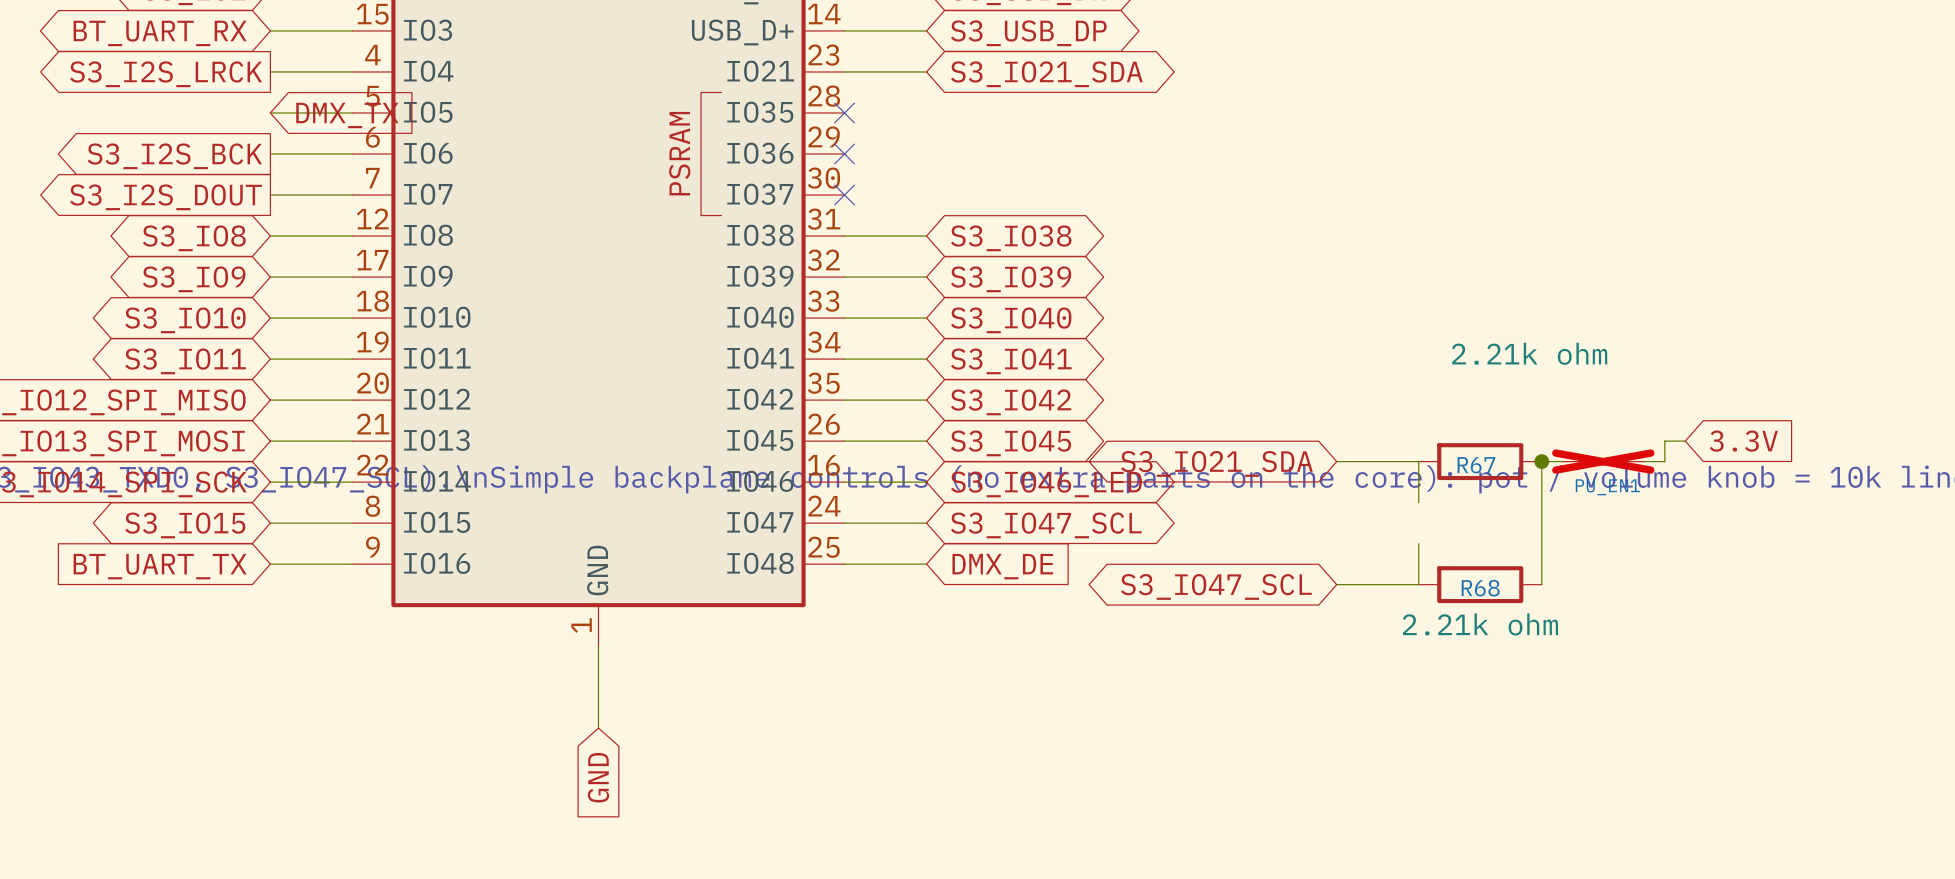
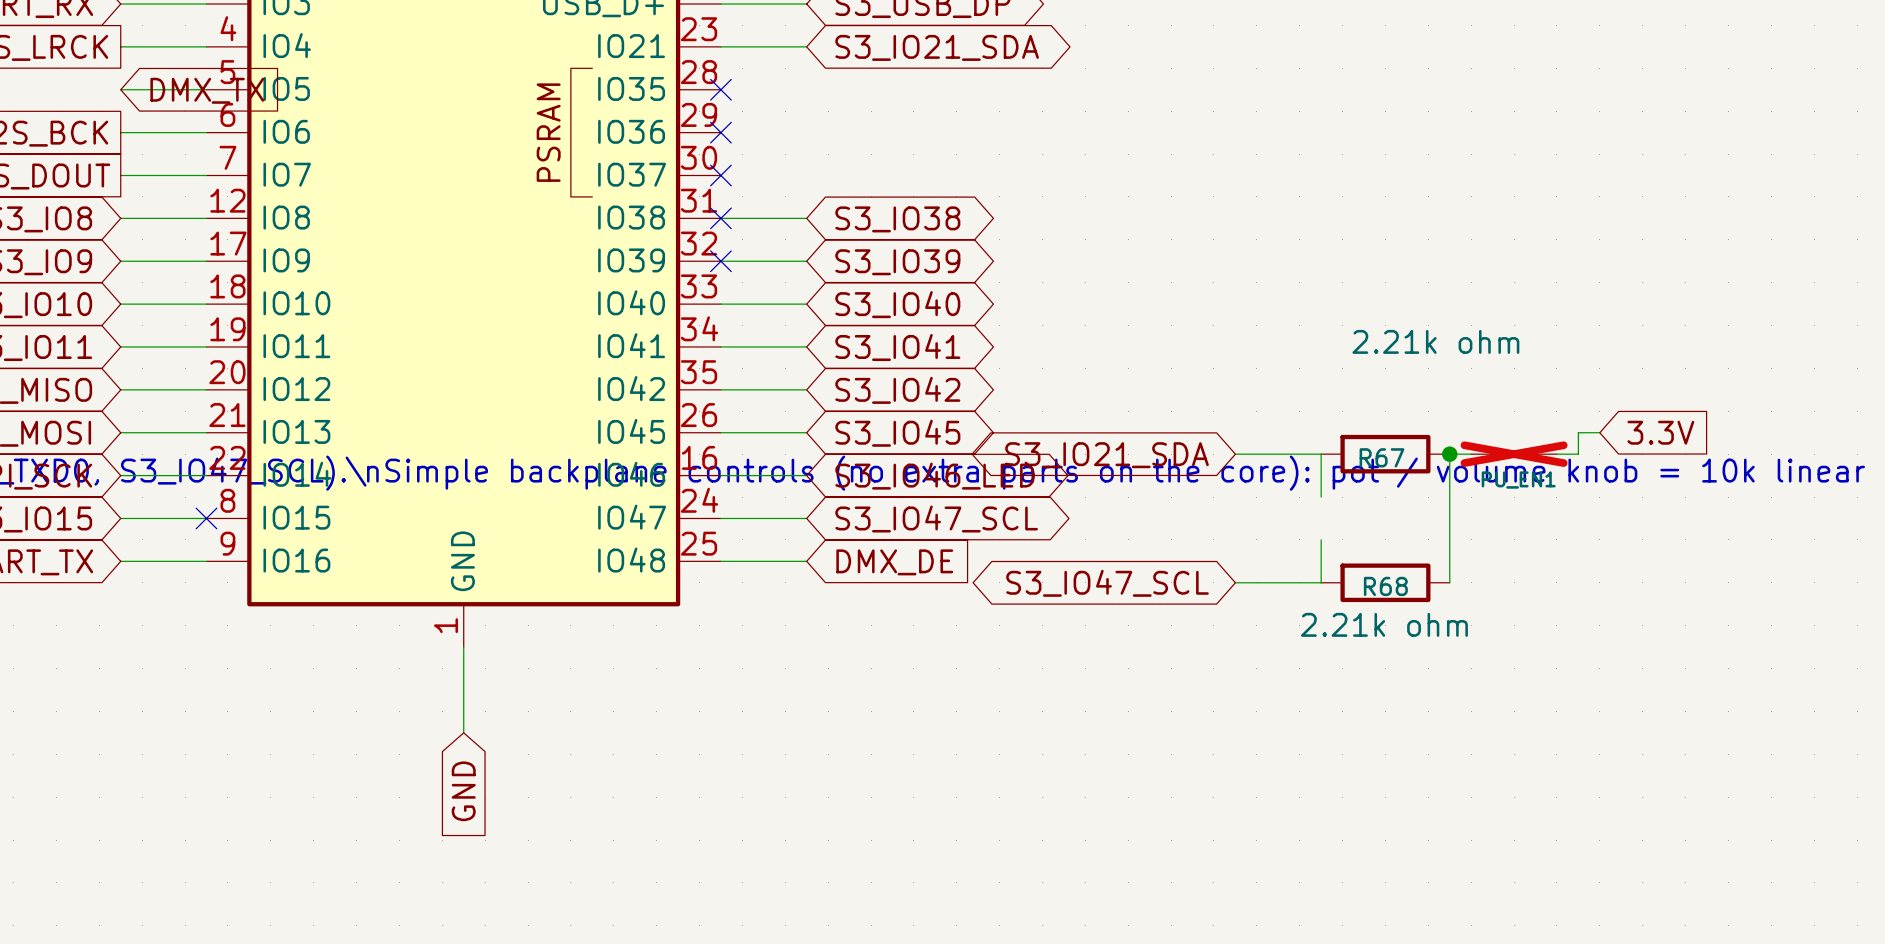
no-connect mark: none -> (720, 218)
no-connect mark: none -> (720, 261)
no-connect mark: none -> (206, 518)

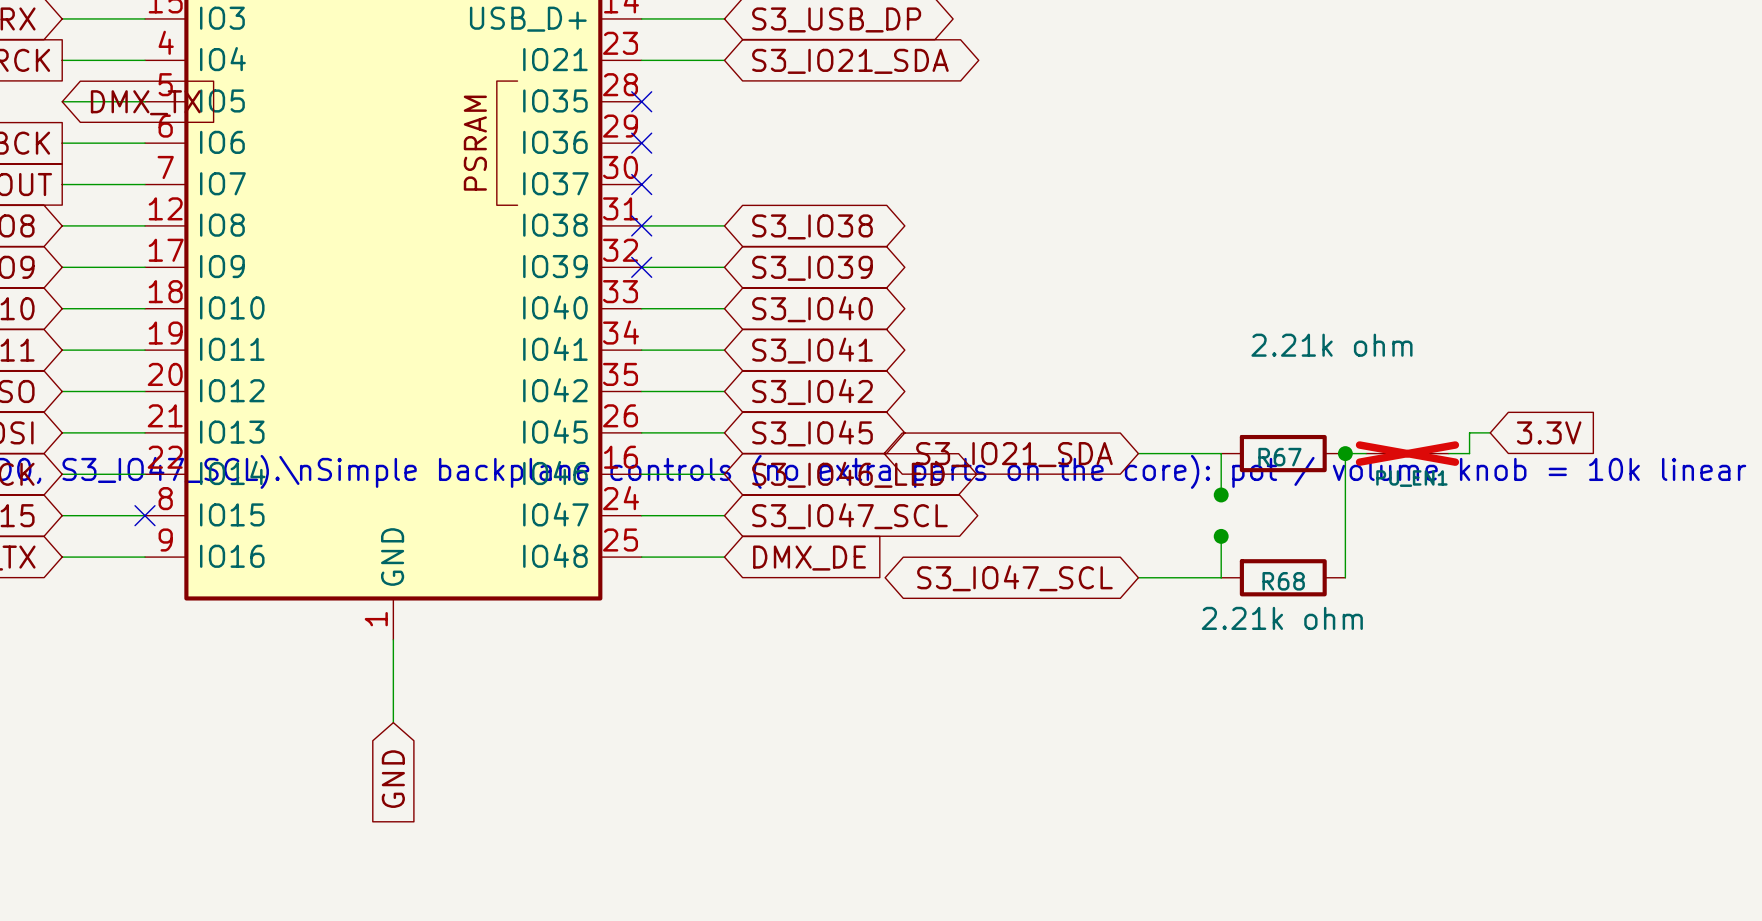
junction: none -> (1221, 494)
junction: none -> (1221, 536)

